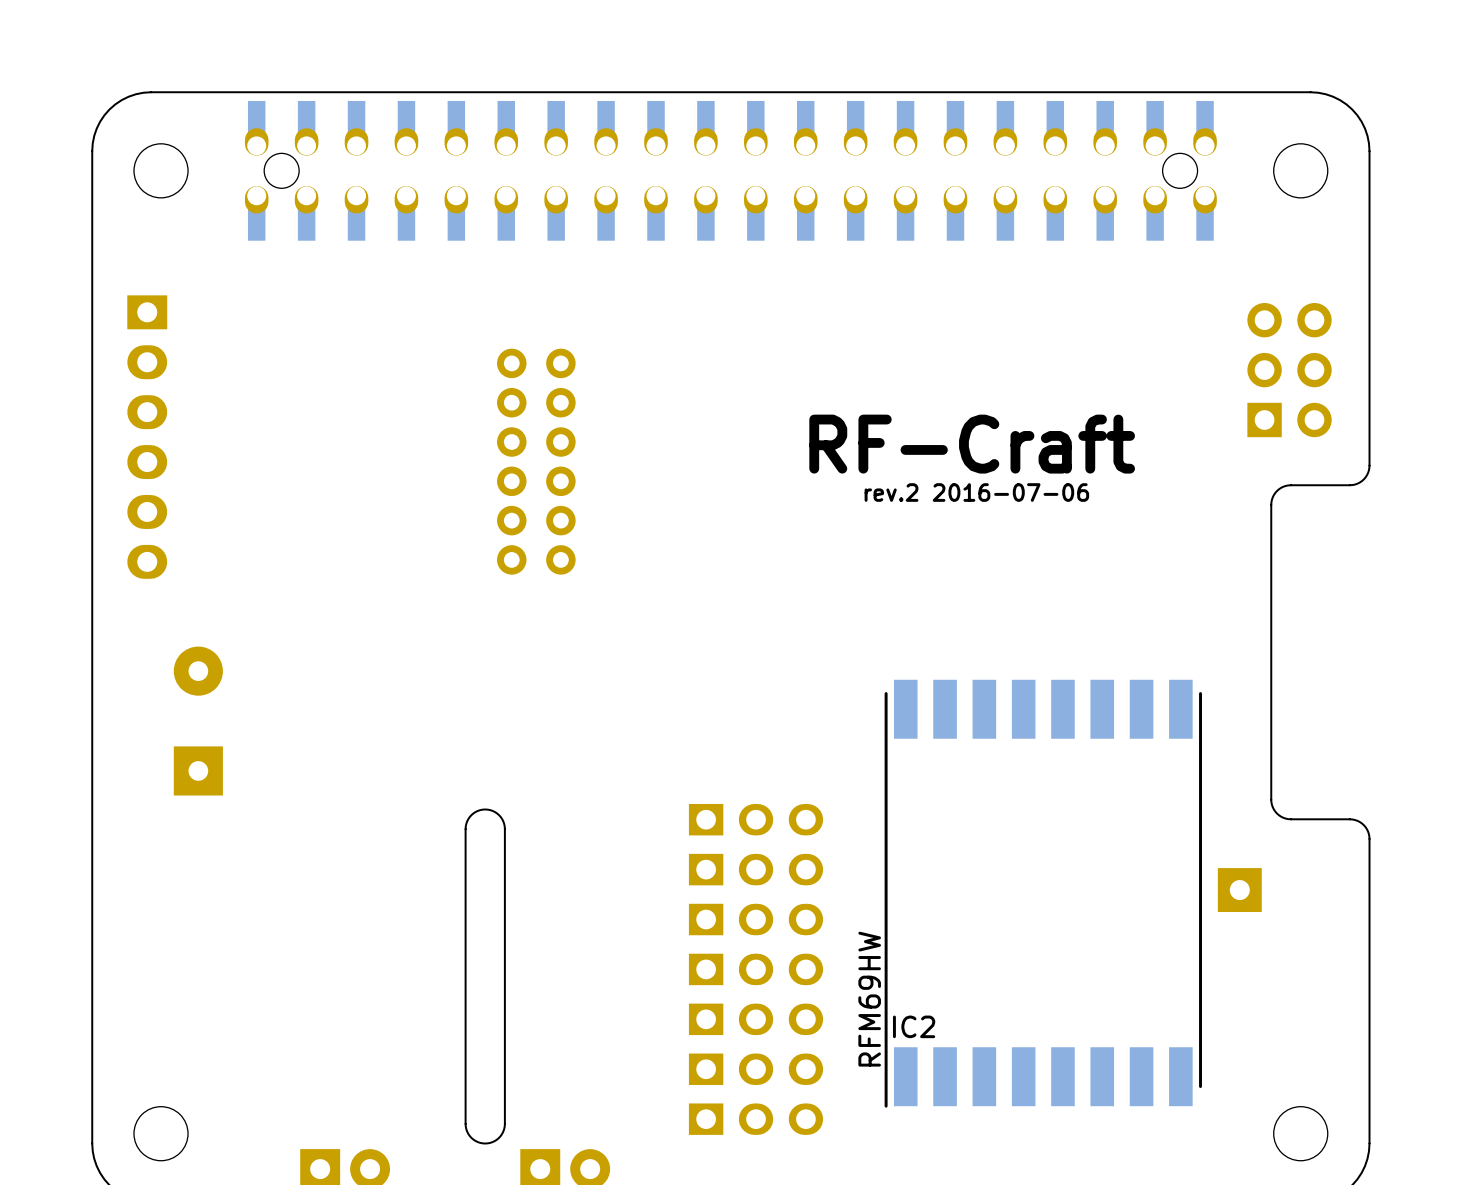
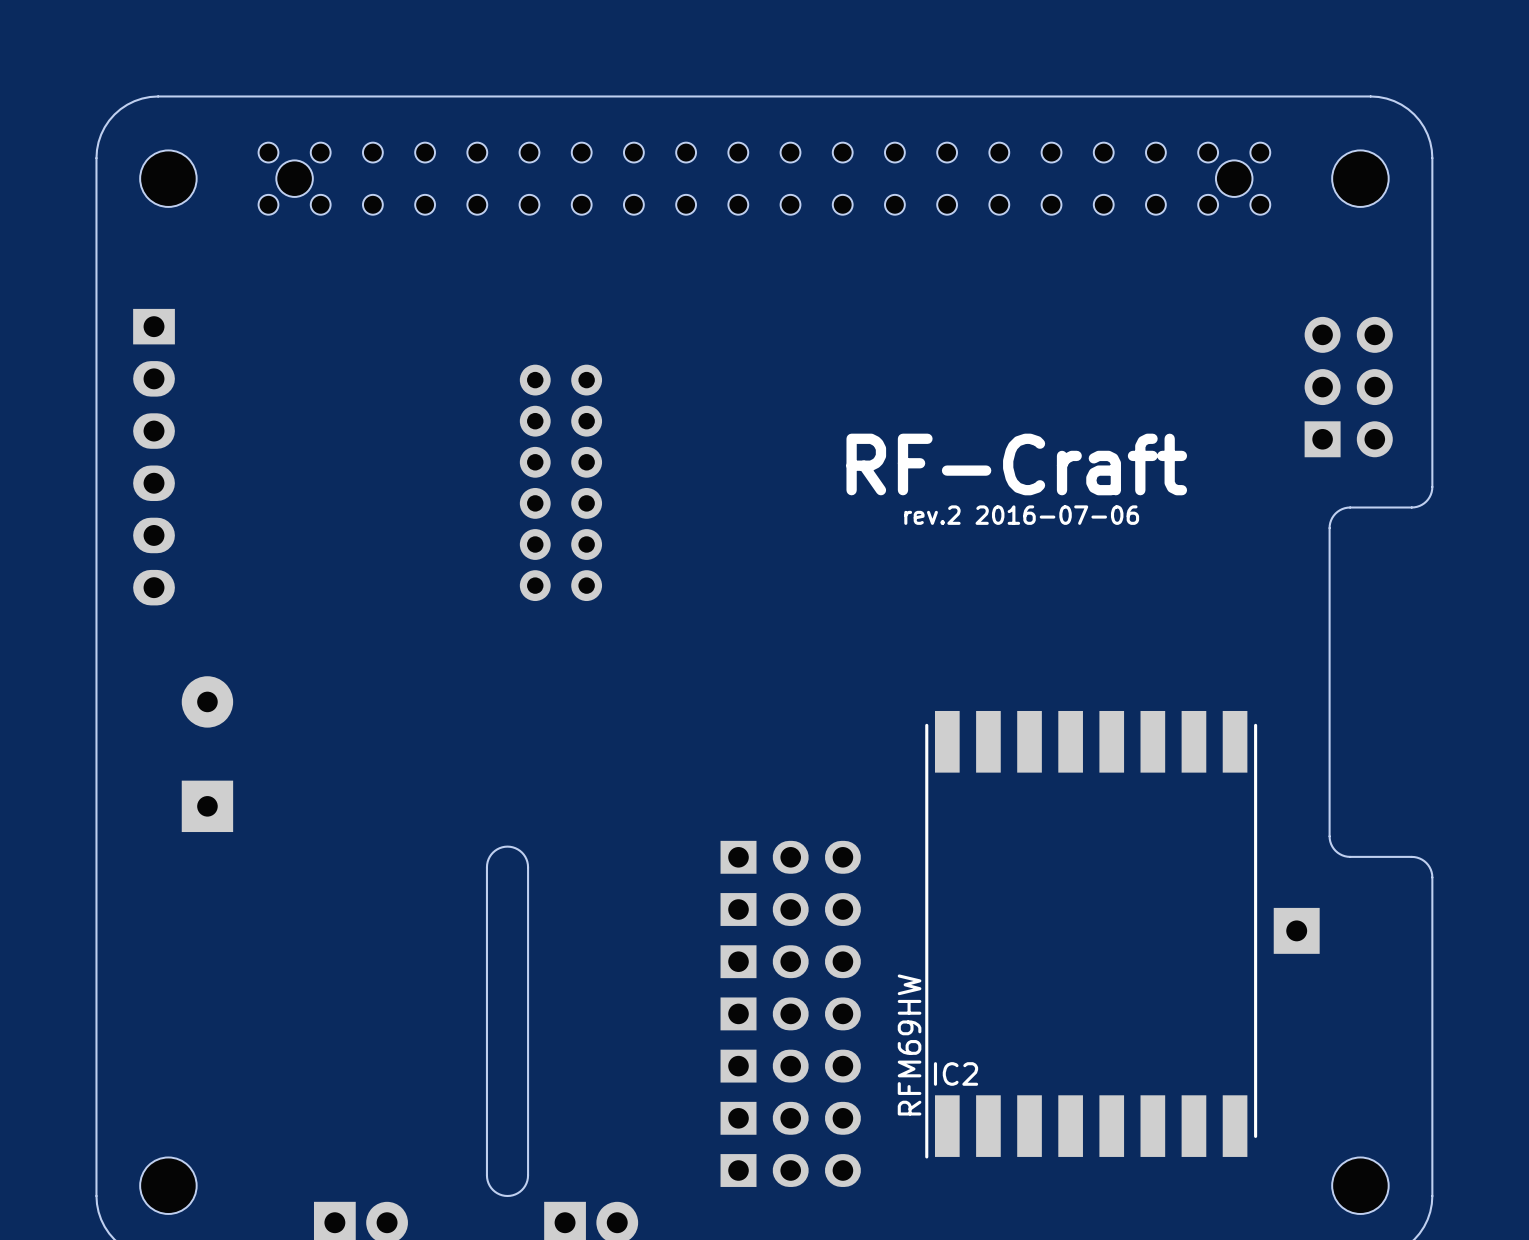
part footprint: [244, 100, 1217, 241] -> [258, 142, 1271, 215]

